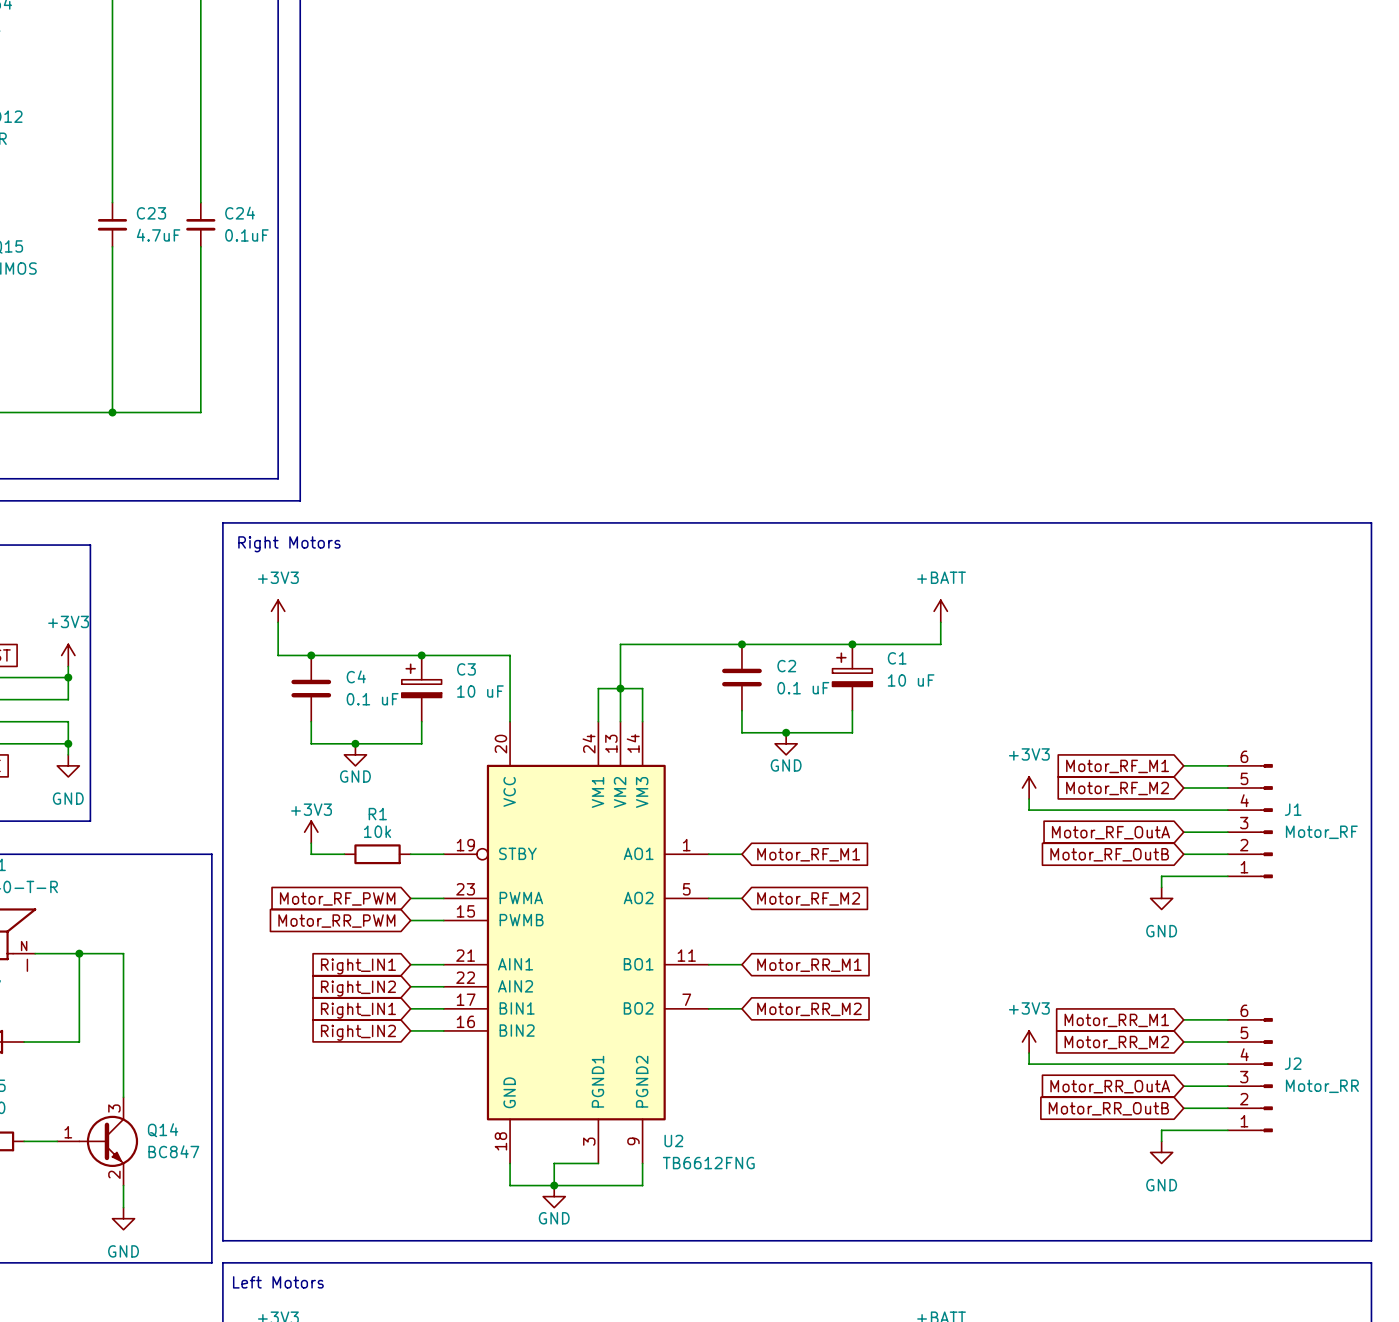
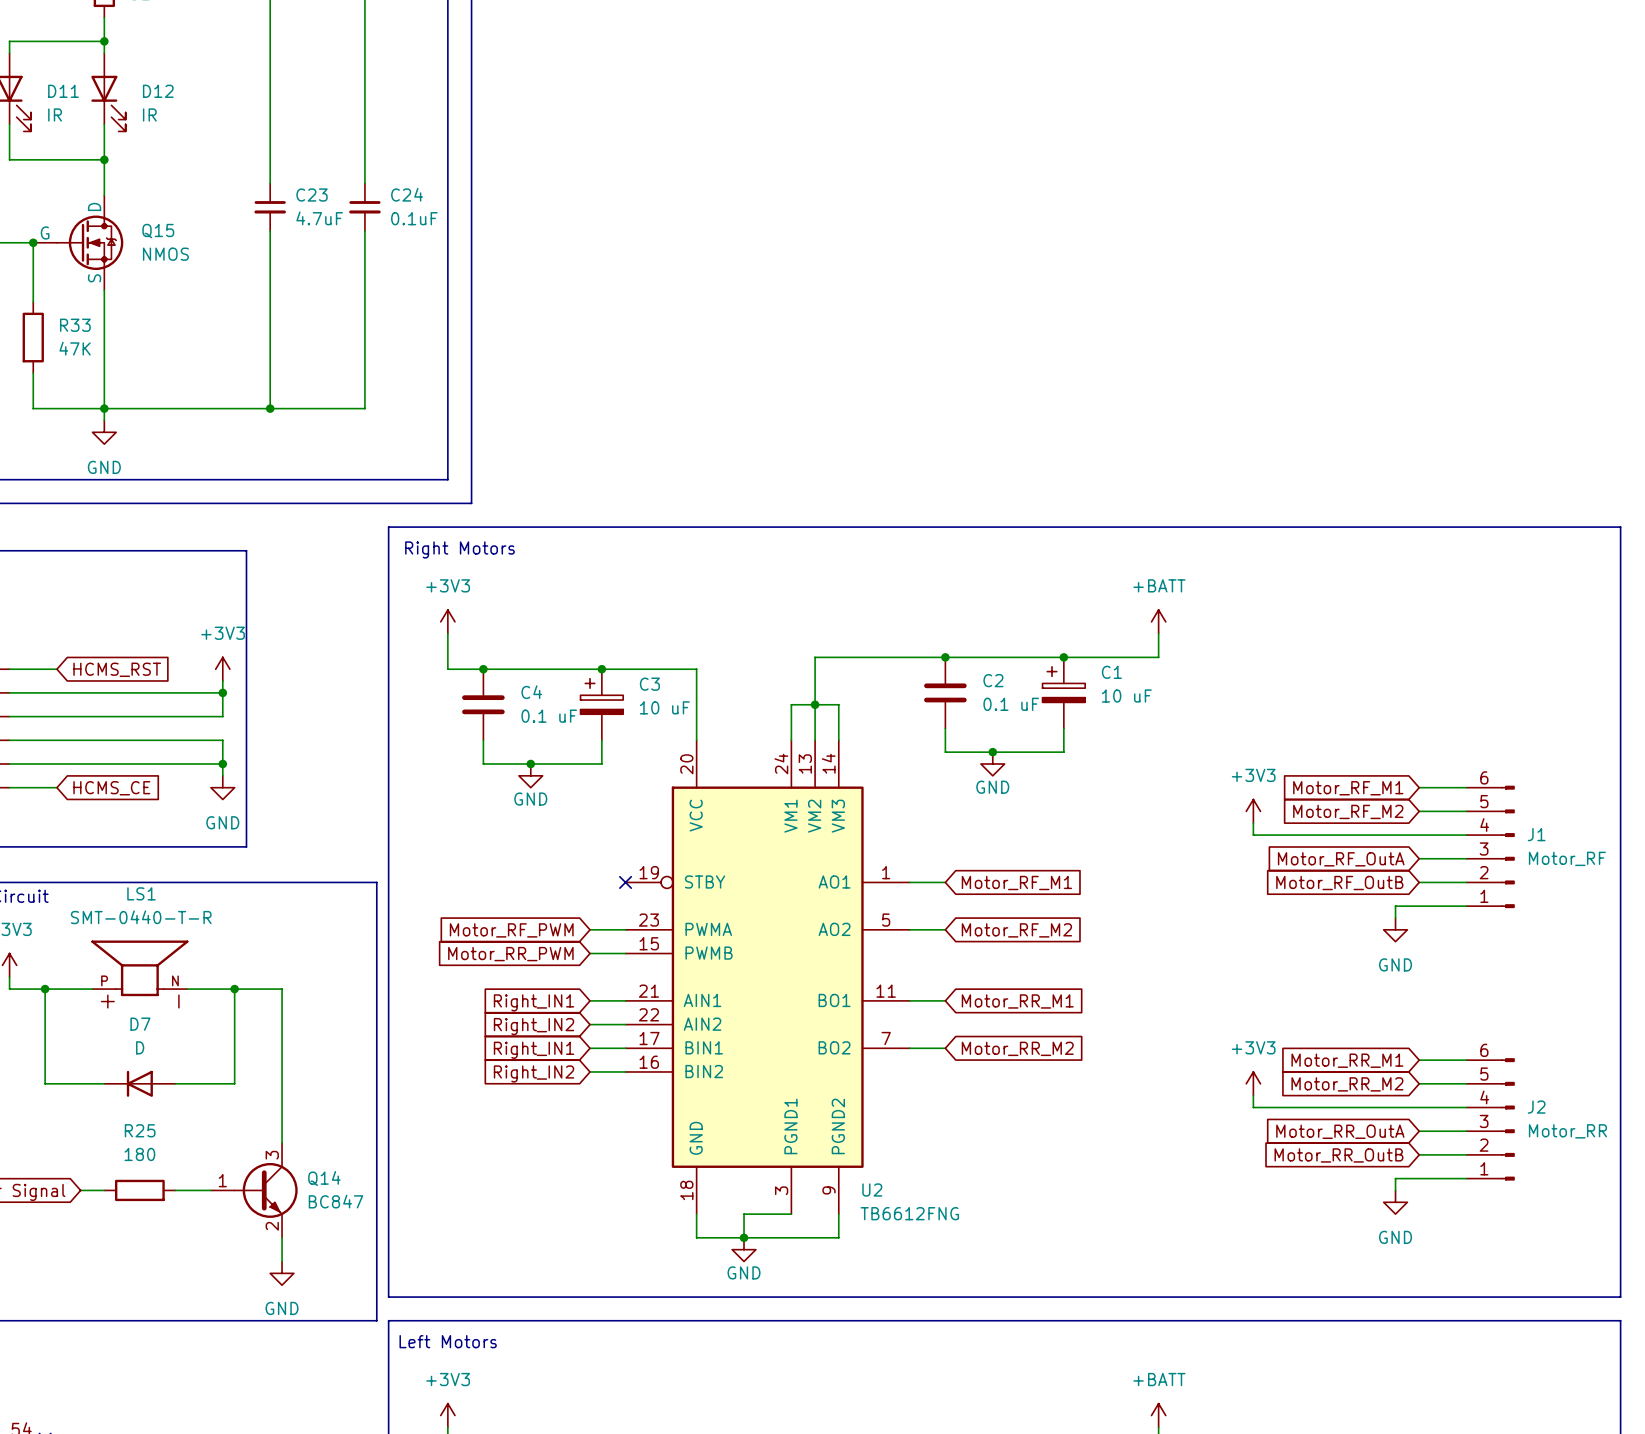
power symbol: +3V3 (311, 832) -> none
wire: (311, 843) (311, 854) (344, 854) -> none
R1: 10k (377, 854) -> none
wire: (410, 854) (443, 854) -> none
no-connect mark: none -> (625, 882)

